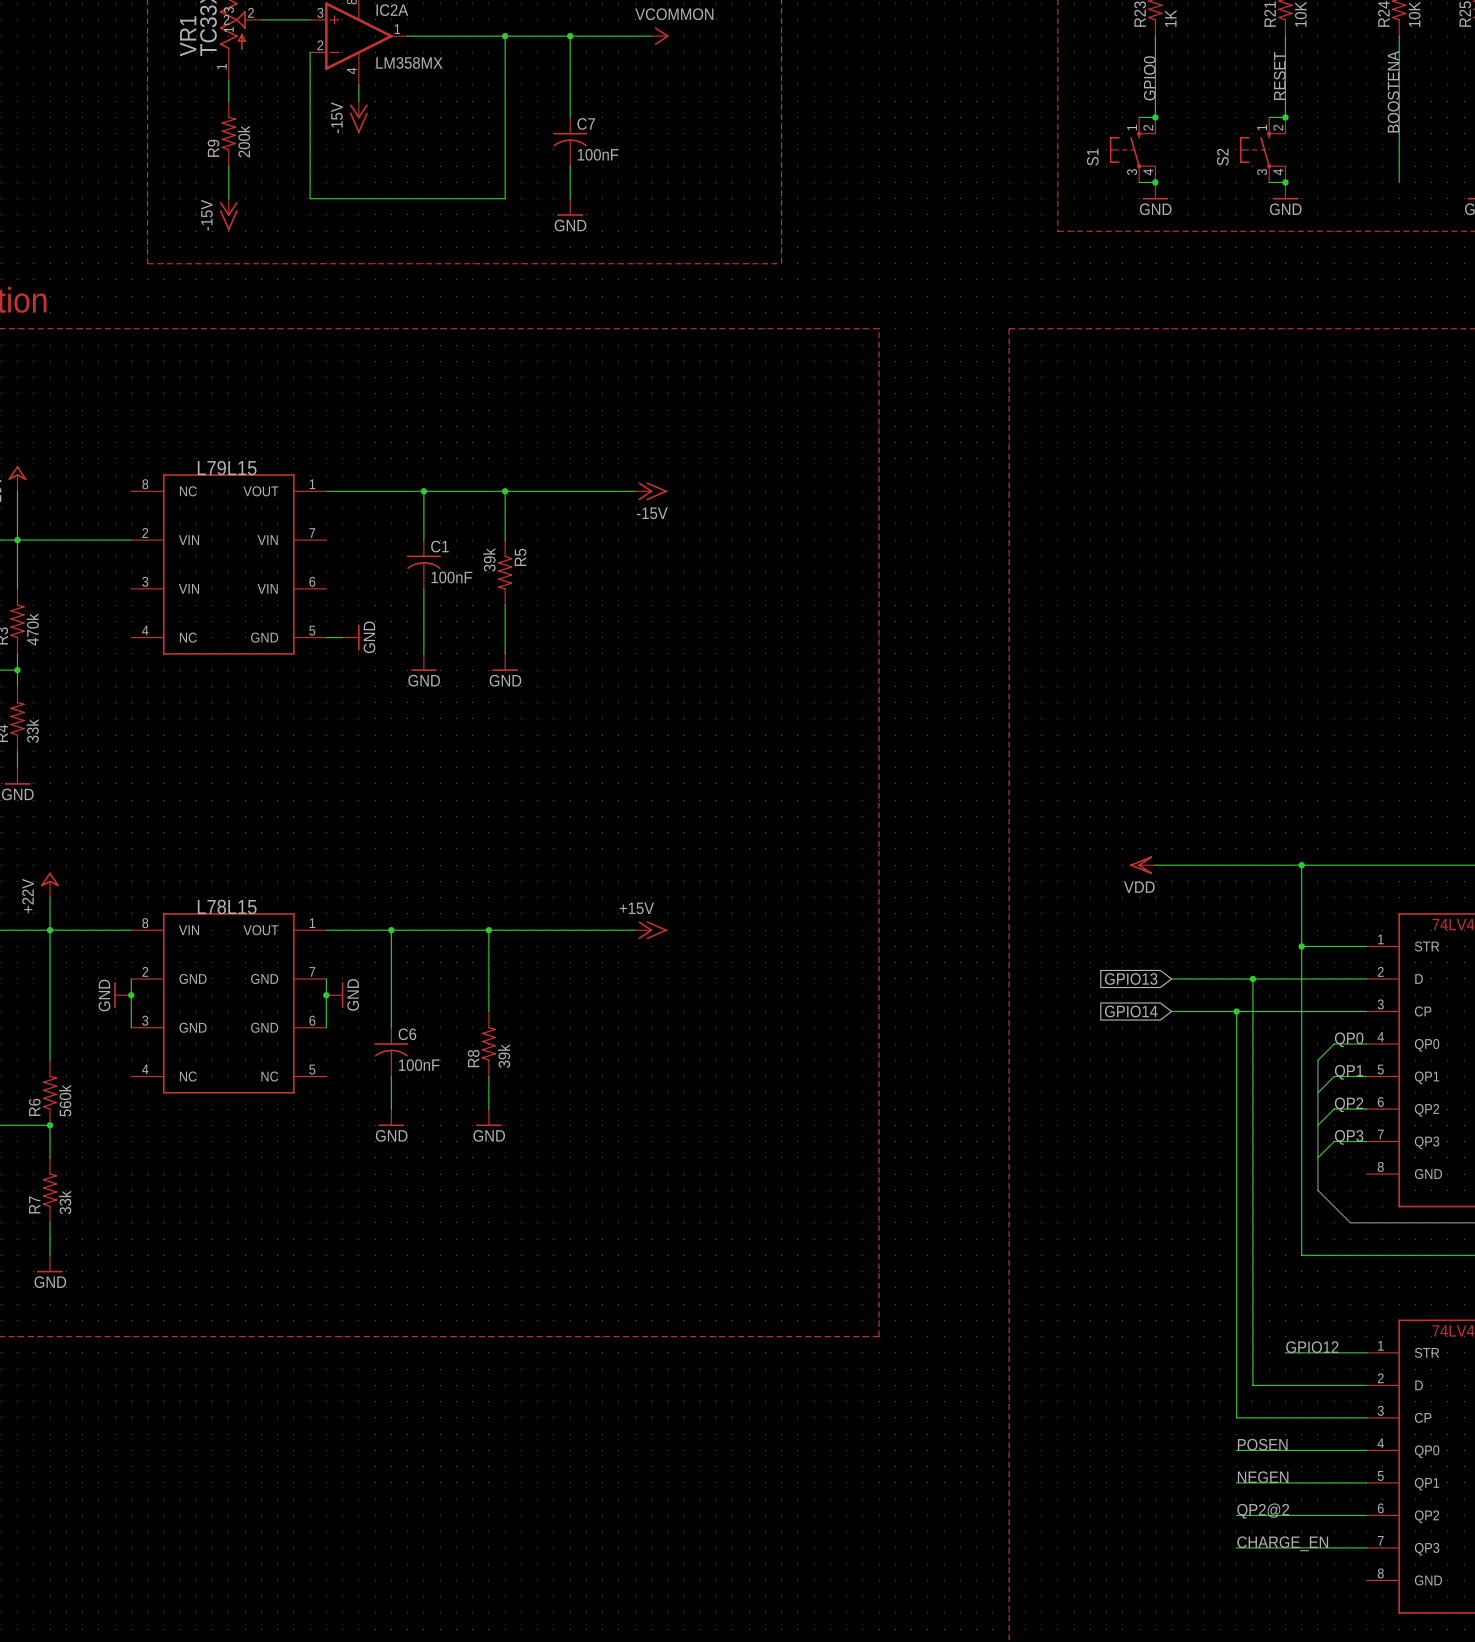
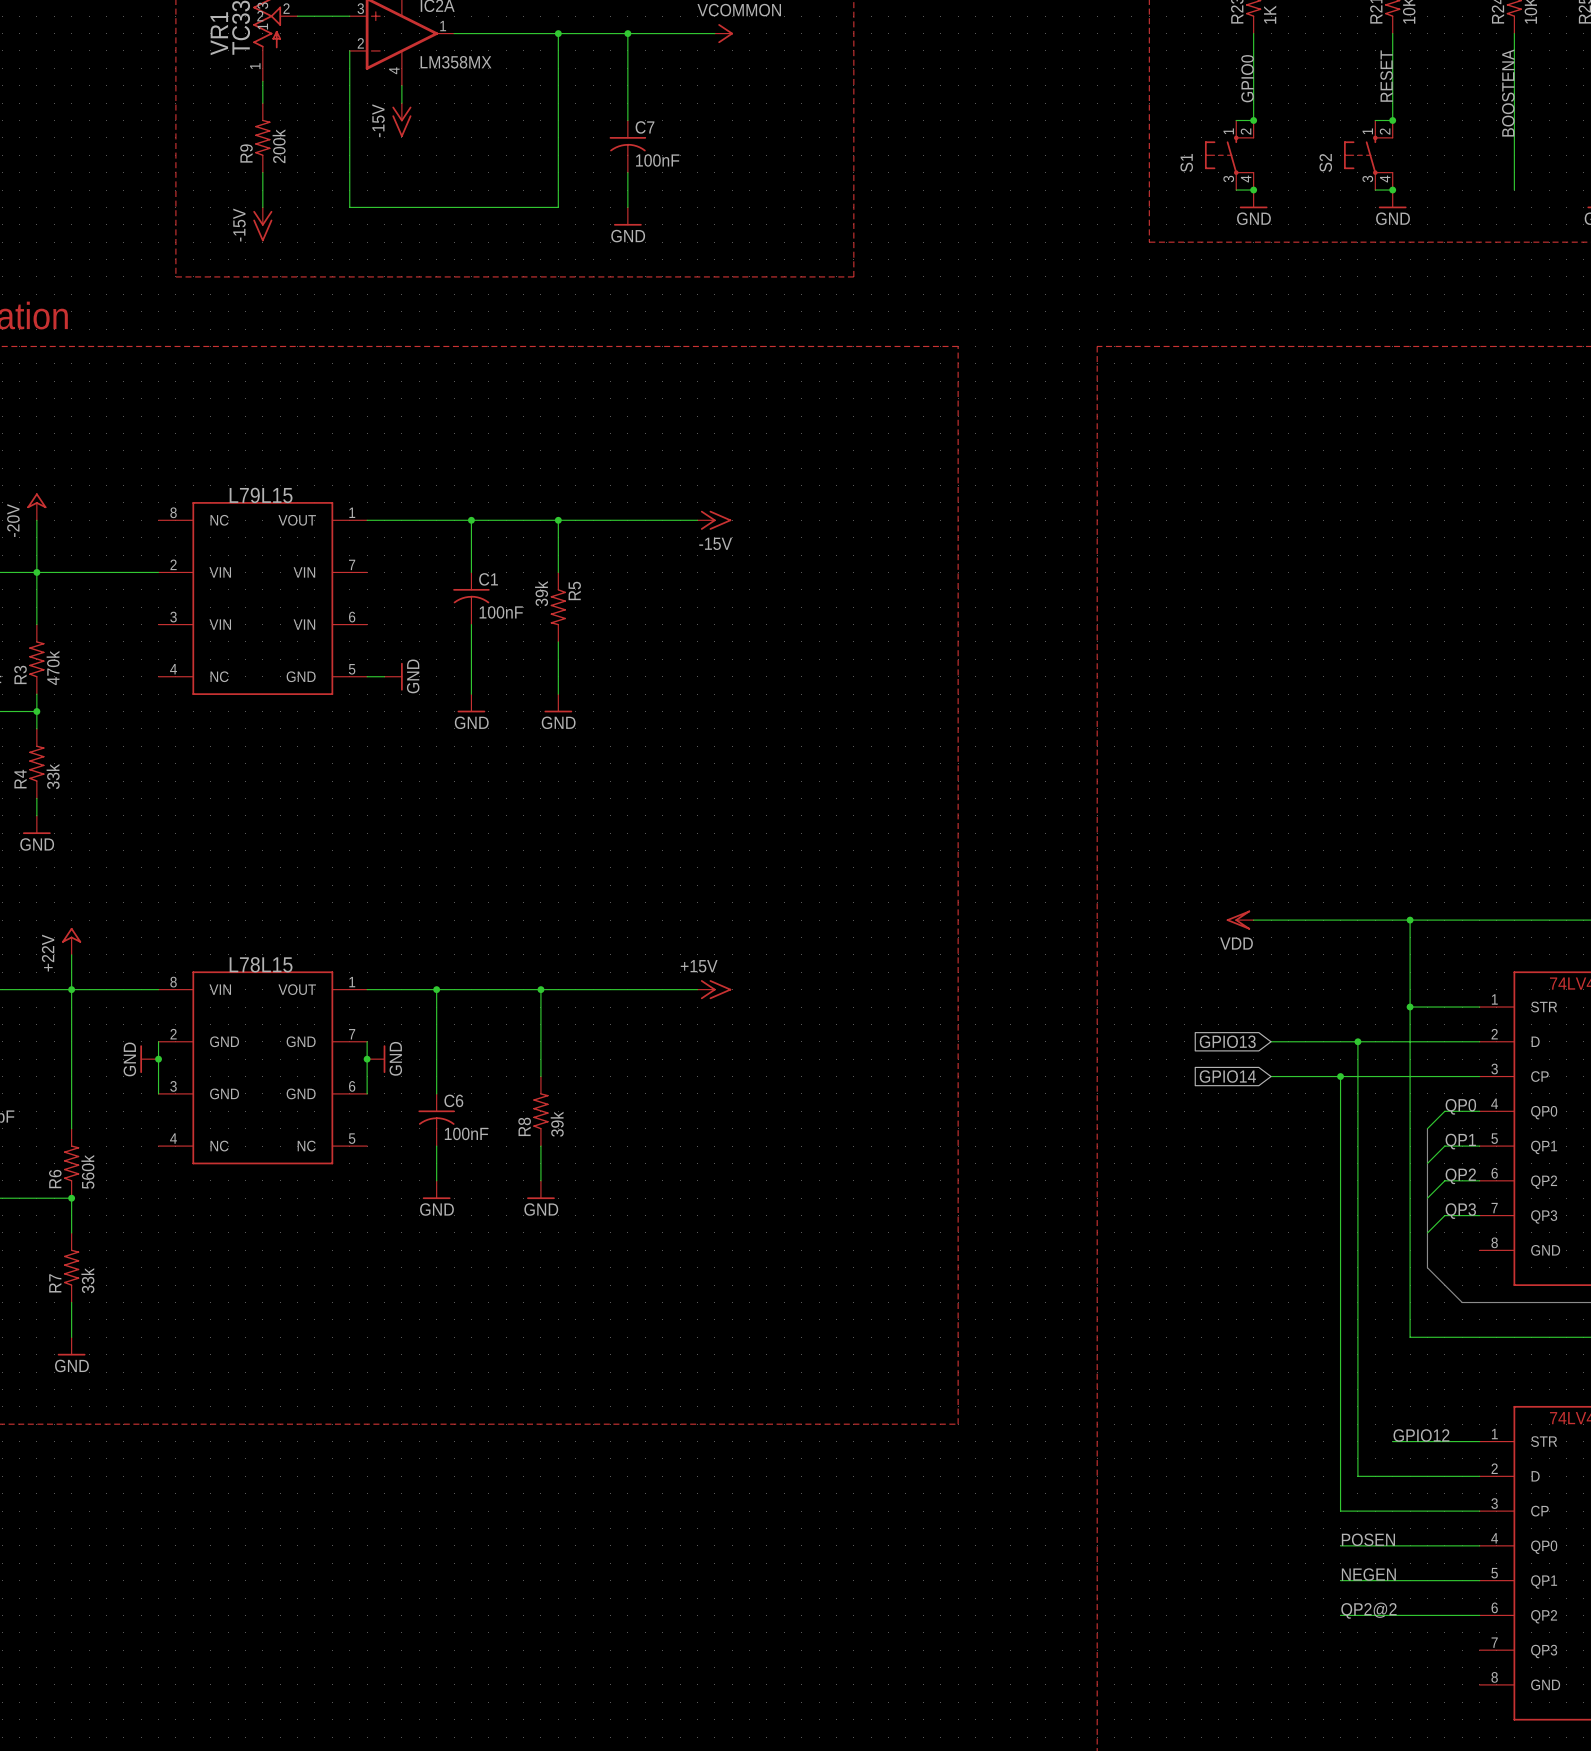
label: CHARGE_EN (1282, 1543) -> none
wire: (1236, 1547) (1366, 1547) -> none

